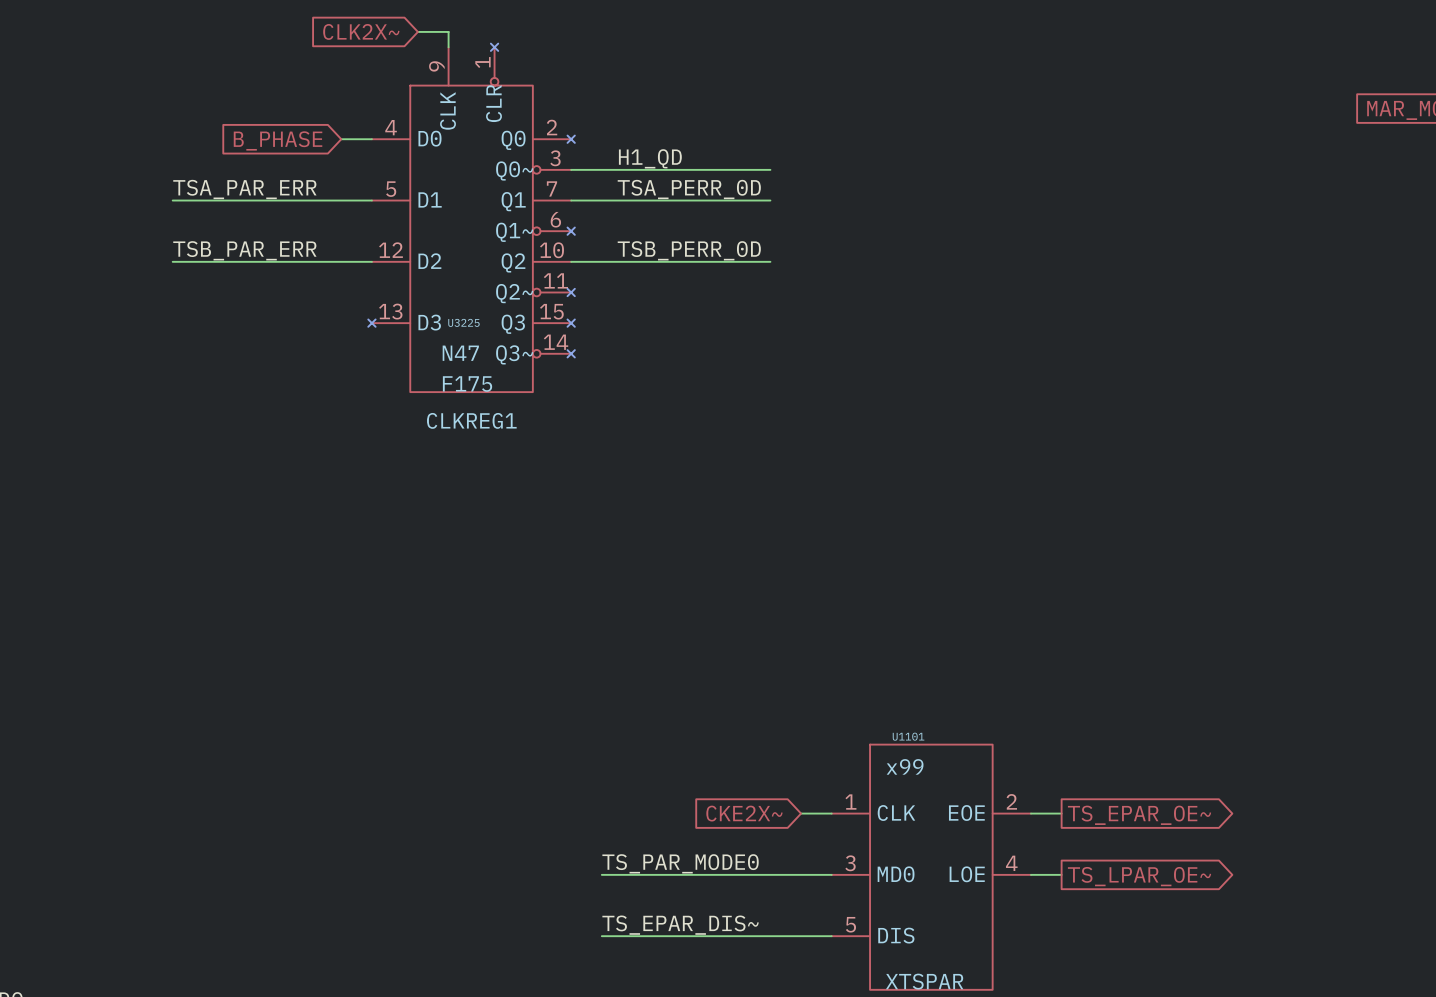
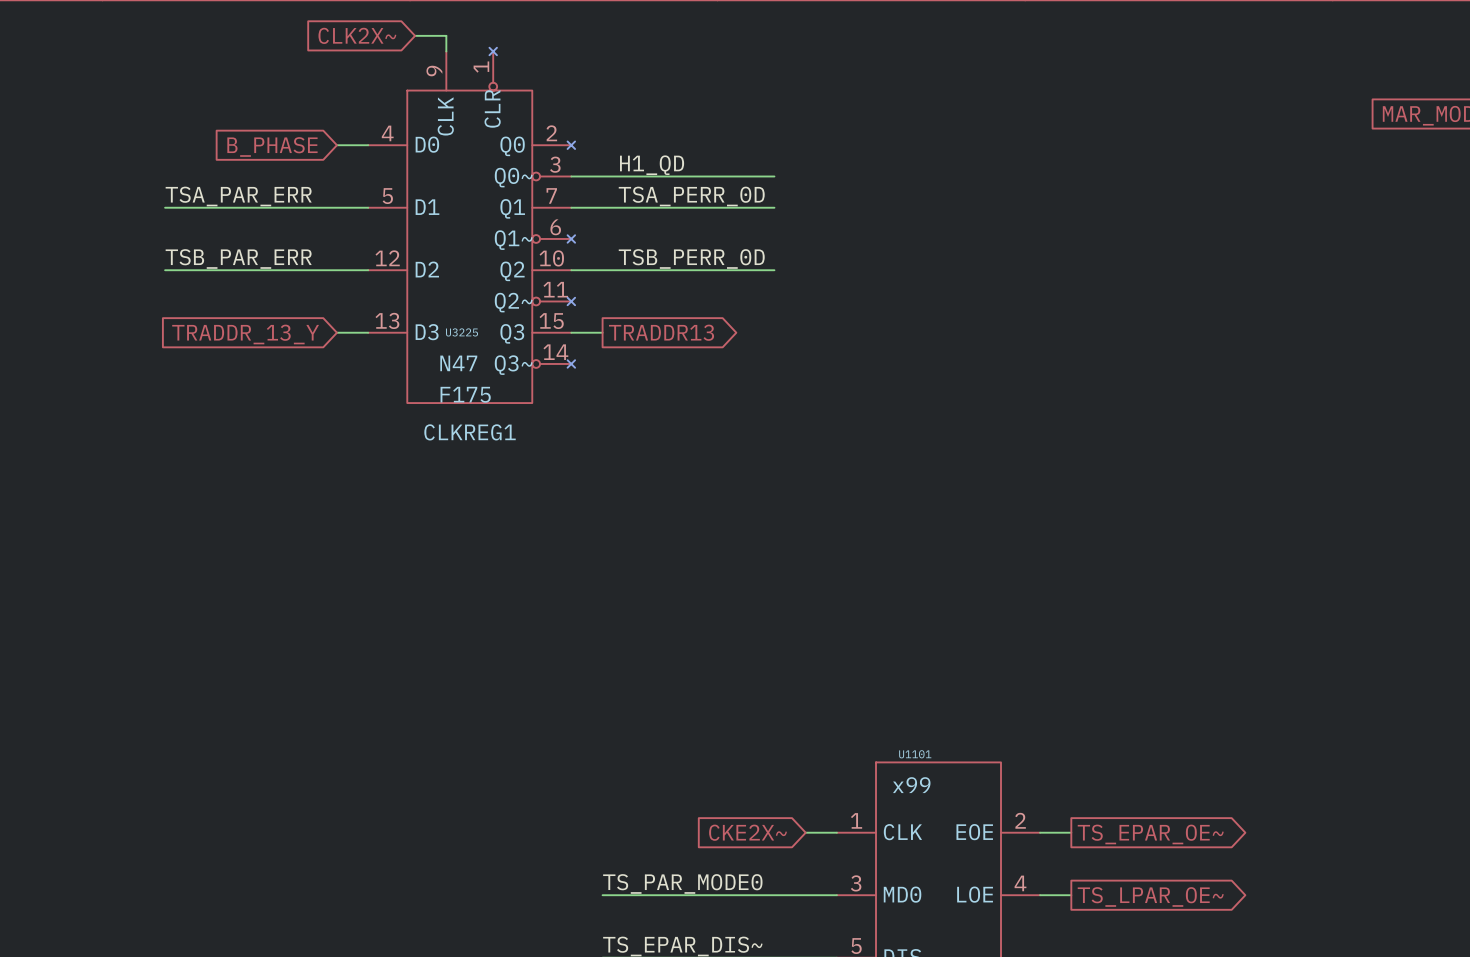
wire: none -> (336, 332) (368, 332)
no-connect mark: (371, 323) -> none
wire: none -> (571, 332) (602, 332)
no-connect mark: (571, 323) -> none
global label: none -> TRADDR13 (661, 332)
global label: none -> TRADDR_13_Y (245, 334)

